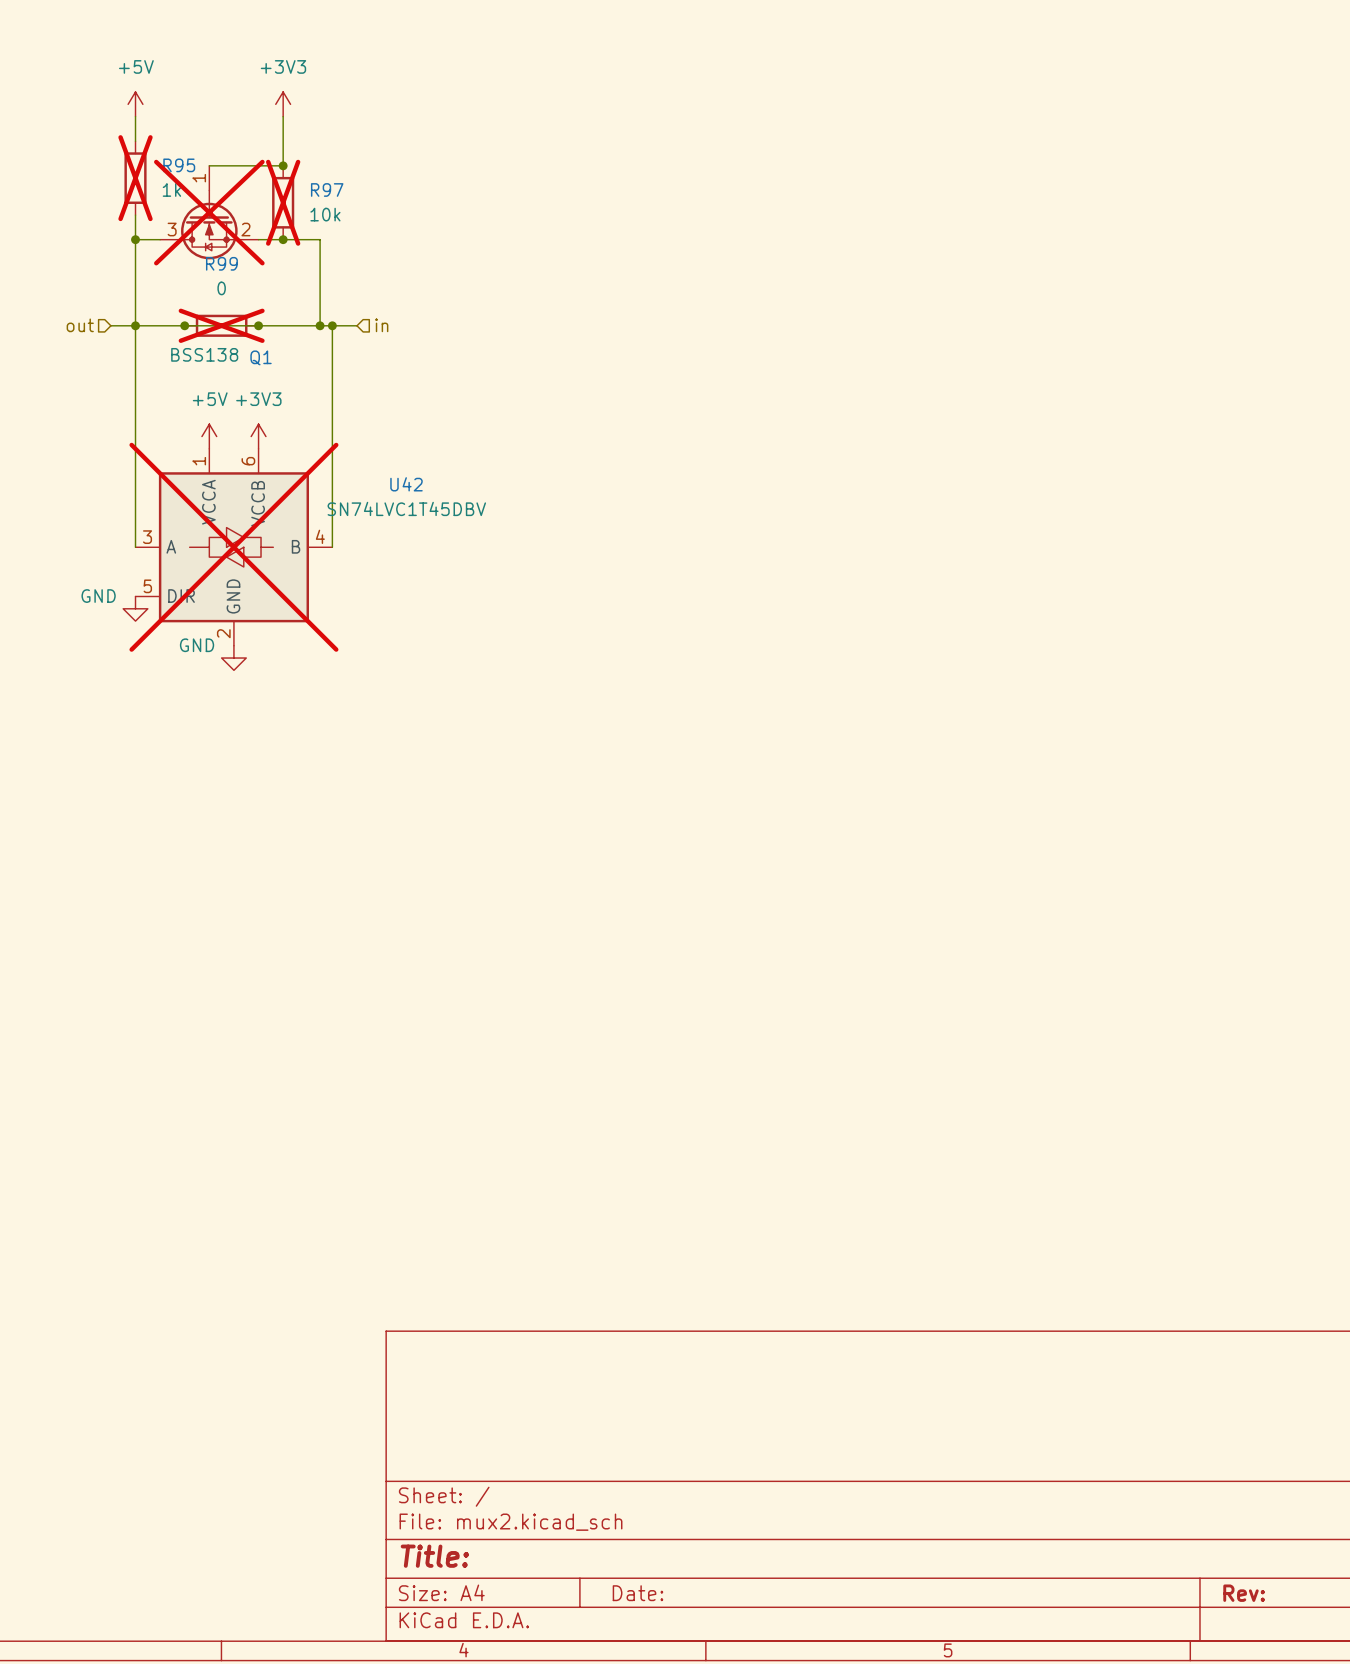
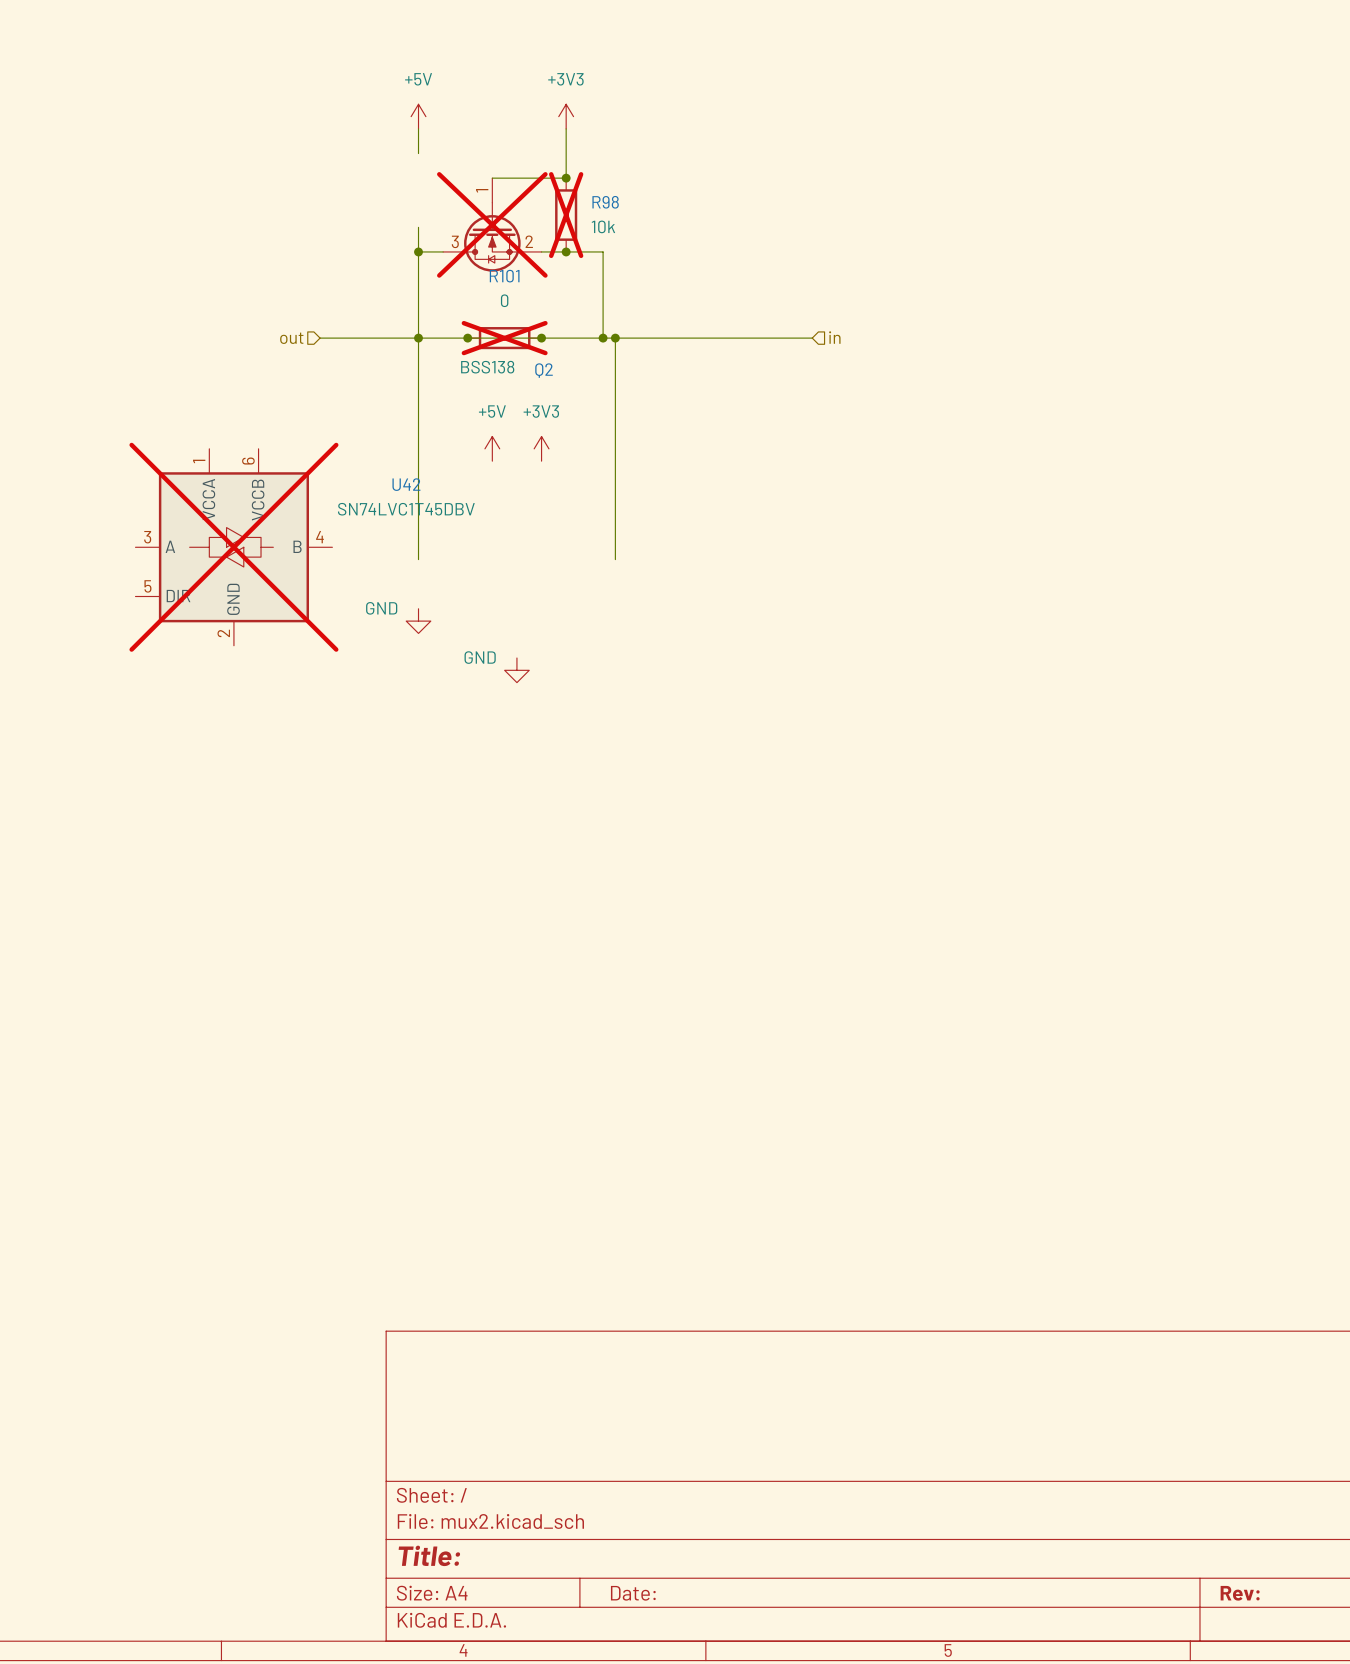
power symbol: +5V (135, 104) -> none
power symbol: +3V3 (283, 104) -> none
wire: (135, 116) (135, 141) -> none
wire: (283, 116) (283, 165) (209, 165) -> none
power symbol: none -> +5V (418, 116)
power symbol: none -> +3V3 (566, 116)
wire: none -> (418, 128) (418, 153)
wire: none -> (566, 128) (566, 178) (492, 178)
junction: (283, 165) -> none
R95: 1k (135, 178) -> none
junction: none -> (566, 178)
R97: 10k (283, 202) -> none
Q1: BSS138 (209, 212) -> none
wire: (135, 215) (135, 547) -> none
R98: none -> 10k (566, 215)
Q2: none -> BSS138 (492, 224)
wire: none -> (418, 227) (418, 559)
wire: (135, 239) (160, 239) -> none
junction: (135, 239) -> none
wire: (258, 239) (320, 239) (320, 325) -> none
junction: (283, 239) -> none
wire: none -> (418, 251) (443, 251)
junction: none -> (418, 251)
wire: none -> (541, 251) (603, 251) (603, 338)
junction: none -> (566, 251)
hierarchical label position: out (80, 325) -> out (291, 338)
wire: (110, 325) (356, 325) -> none
junction: (135, 325) -> none
junction: (184, 325) -> none
R99: 0 (221, 325) -> none
junction: (258, 325) -> none
junction: (320, 325) -> none
wire: (332, 325) (332, 547) -> none
junction: (332, 325) -> none
hierarchical label: in (381, 325) -> none
hierarchical label: none -> in (834, 337)
wire: none -> (320, 338) (812, 338)
junction: none -> (418, 338)
junction: none -> (467, 338)
R101: none -> 0 (504, 338)
junction: none -> (541, 338)
junction: none -> (603, 338)
wire: none -> (615, 338) (615, 559)
junction: none -> (615, 338)
power symbol: +5V (209, 436) -> none
power symbol: +3V3 (258, 436) -> none
power symbol: none -> +5V (492, 448)
power symbol: none -> +3V3 (541, 448)
power symbol: GND (135, 608) -> none
power symbol: none -> GND (418, 621)
power symbol: GND (233, 658) -> none
power symbol: none -> GND (516, 670)

